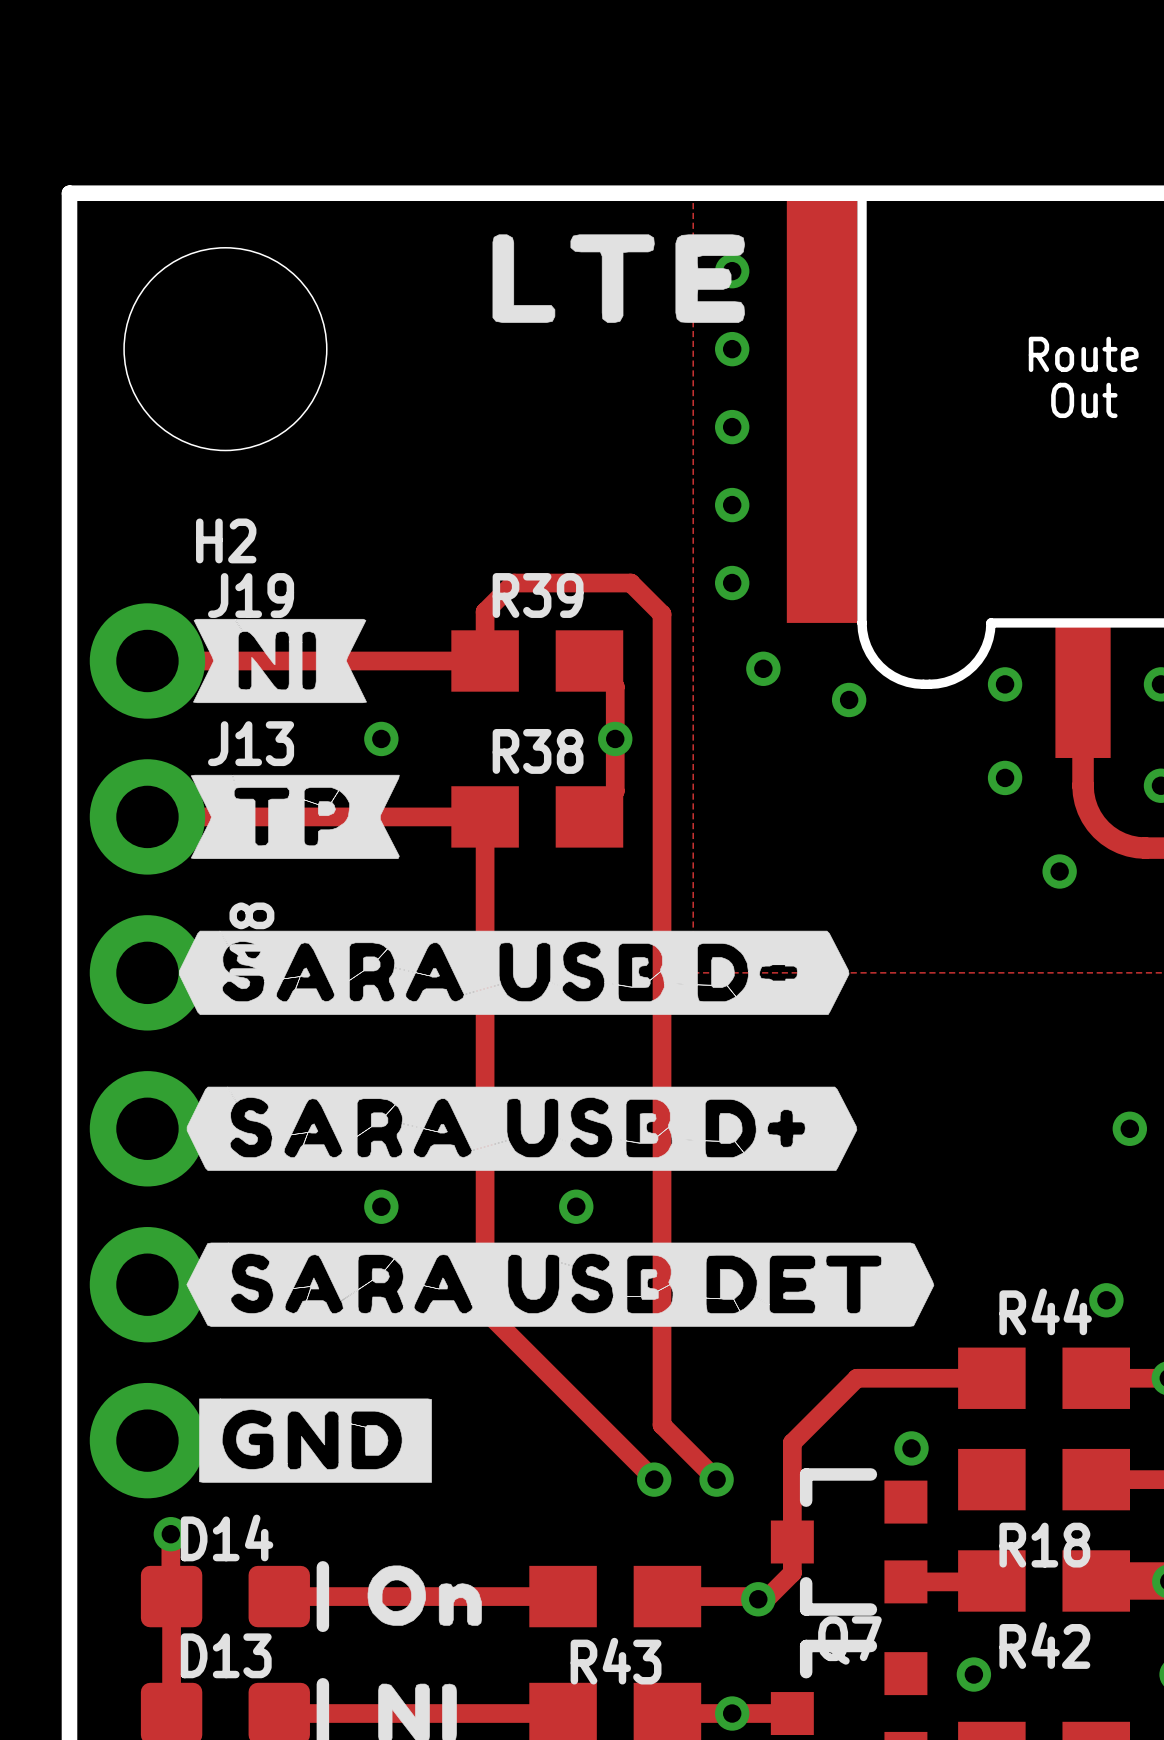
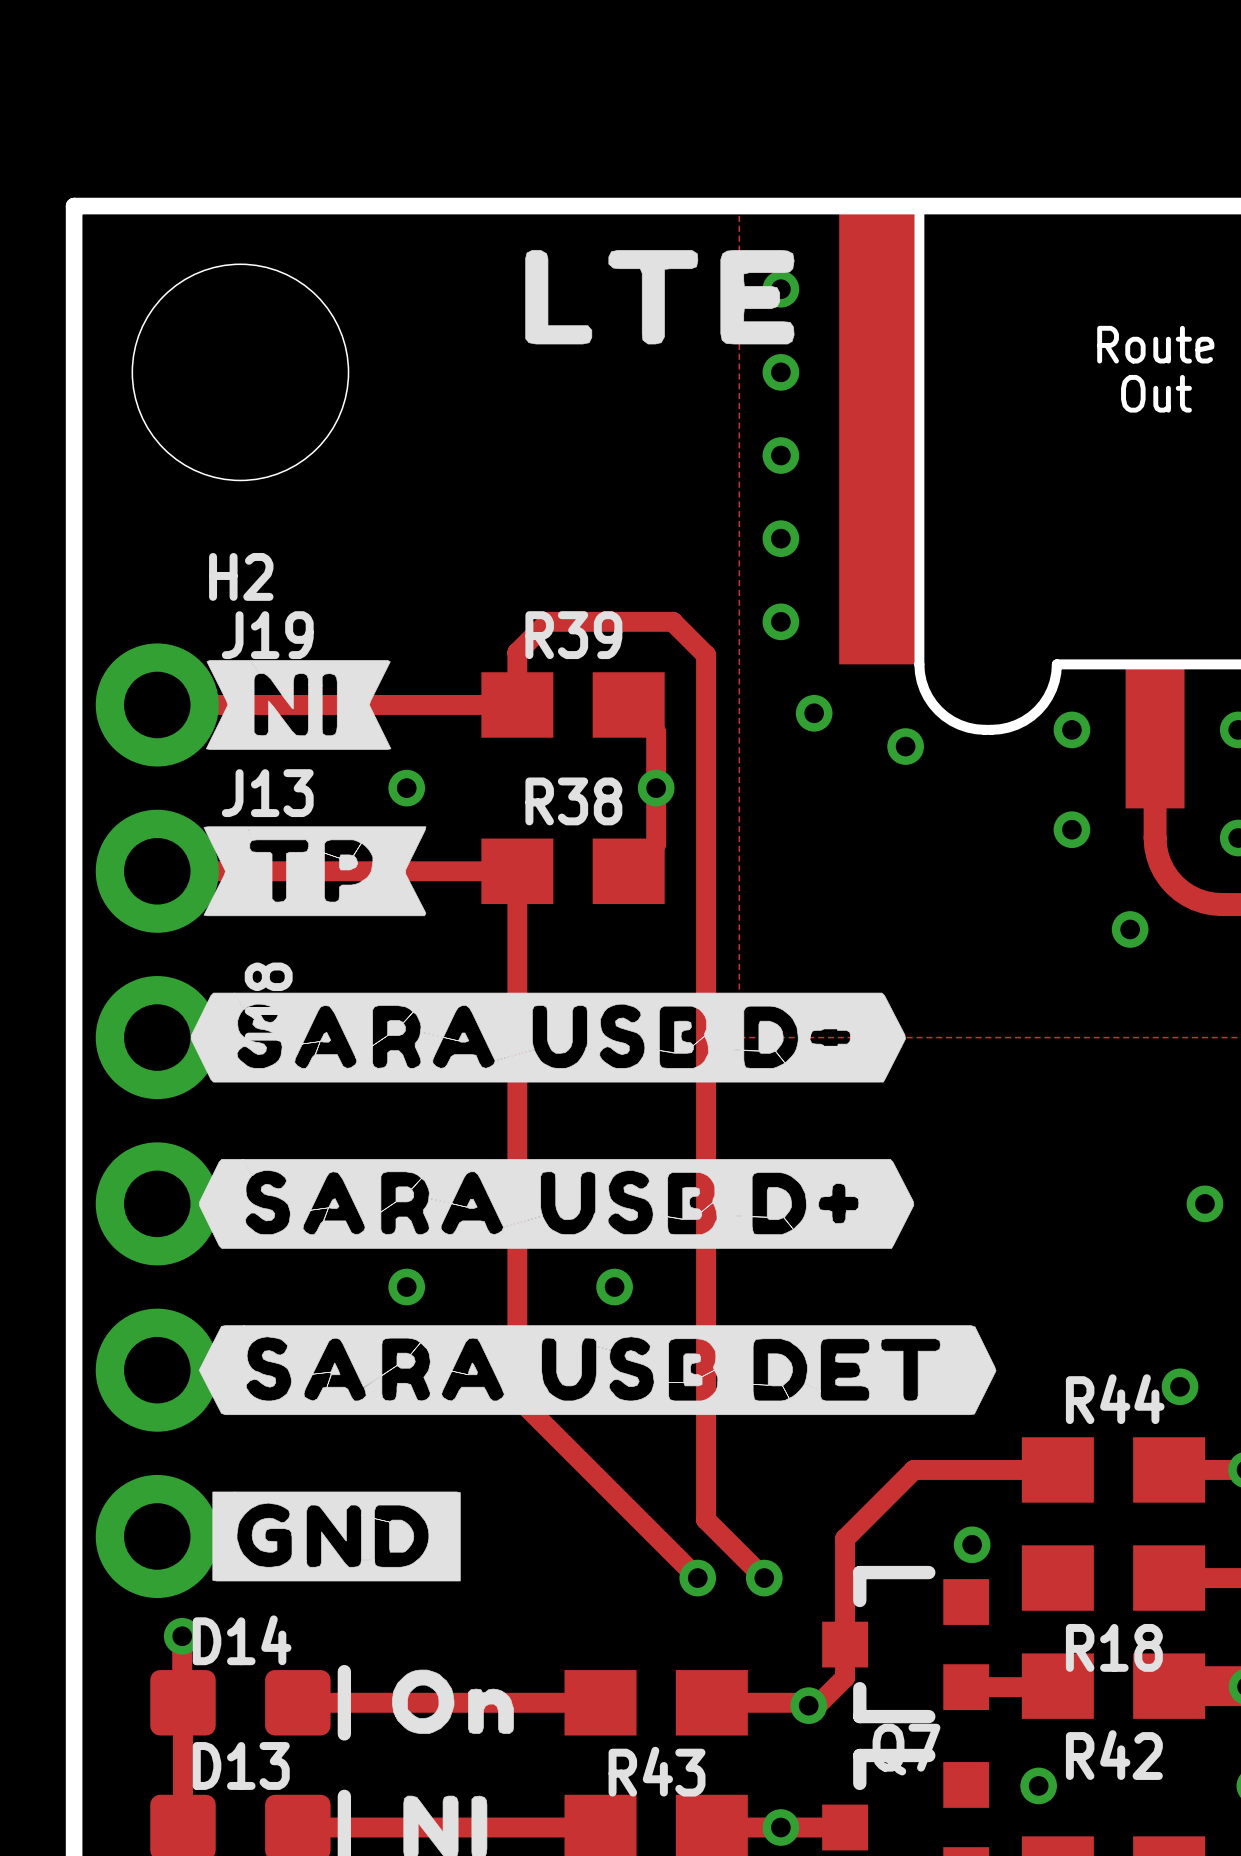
part text position: Route (1083, 354) -> Route (1155, 344)
part text position: Out (1084, 400) -> Out (1156, 393)

